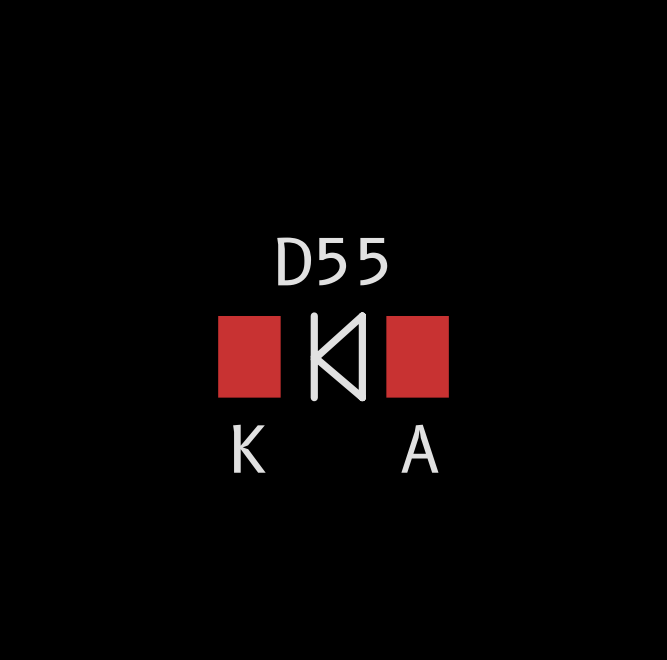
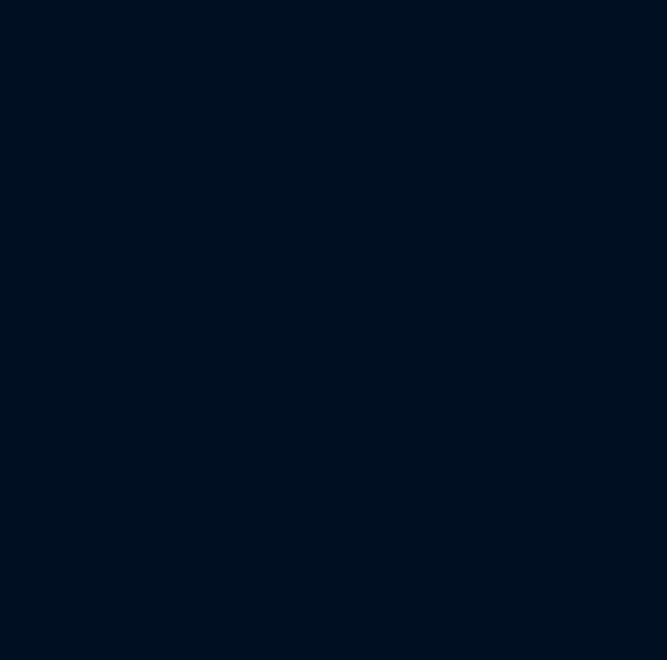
D55: (333, 356) -> none

